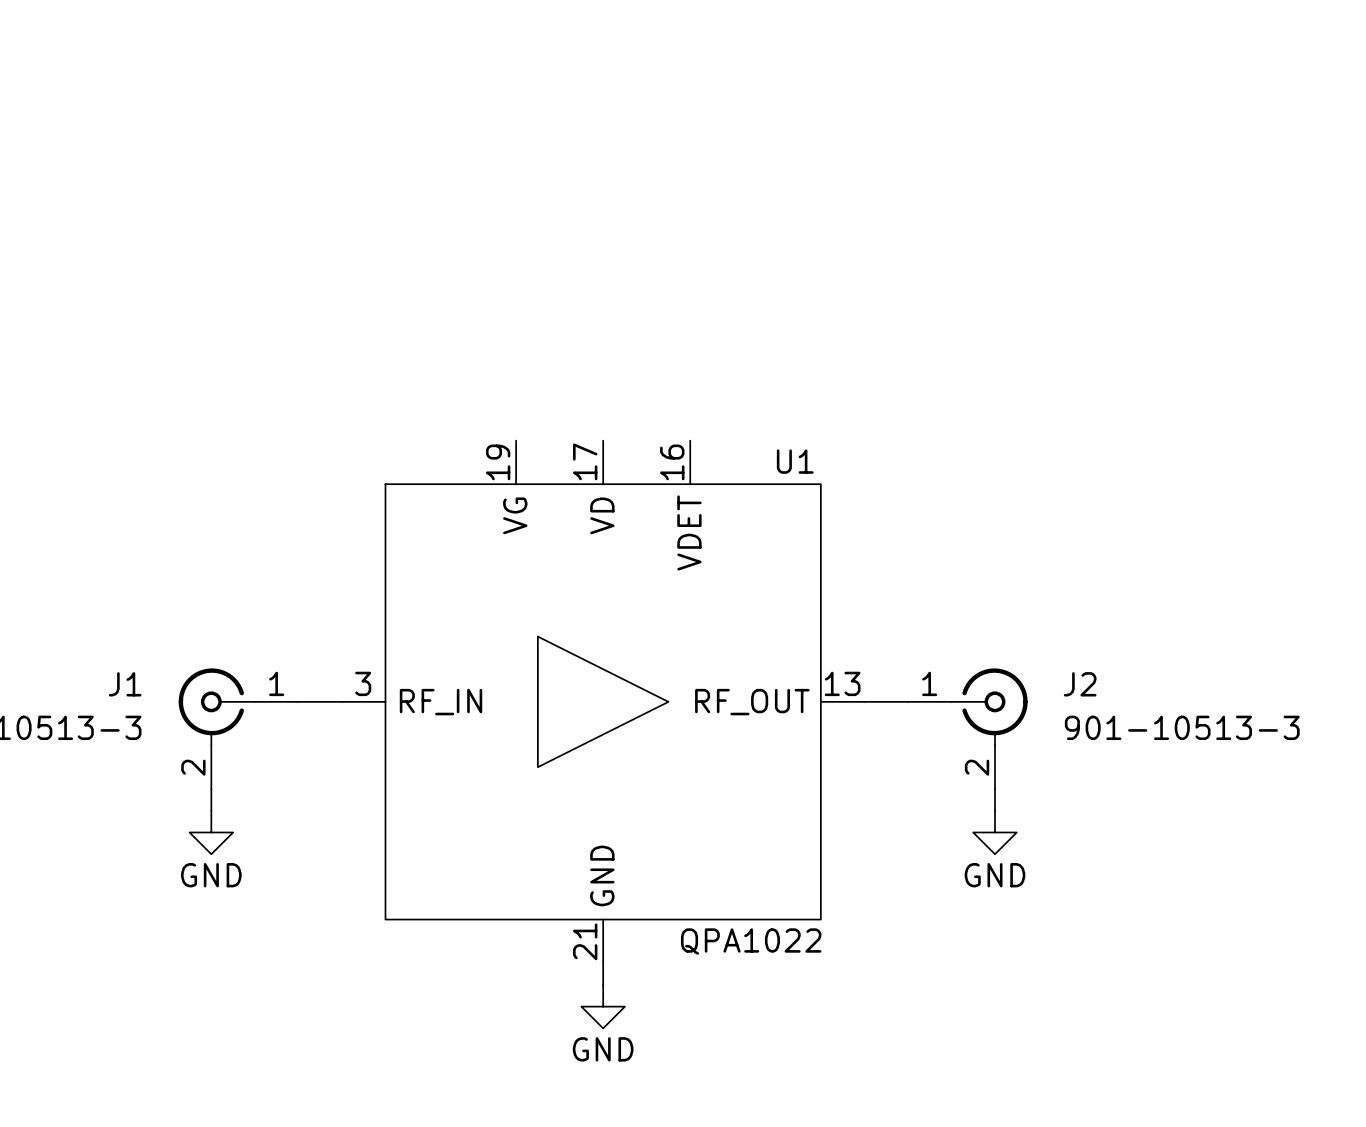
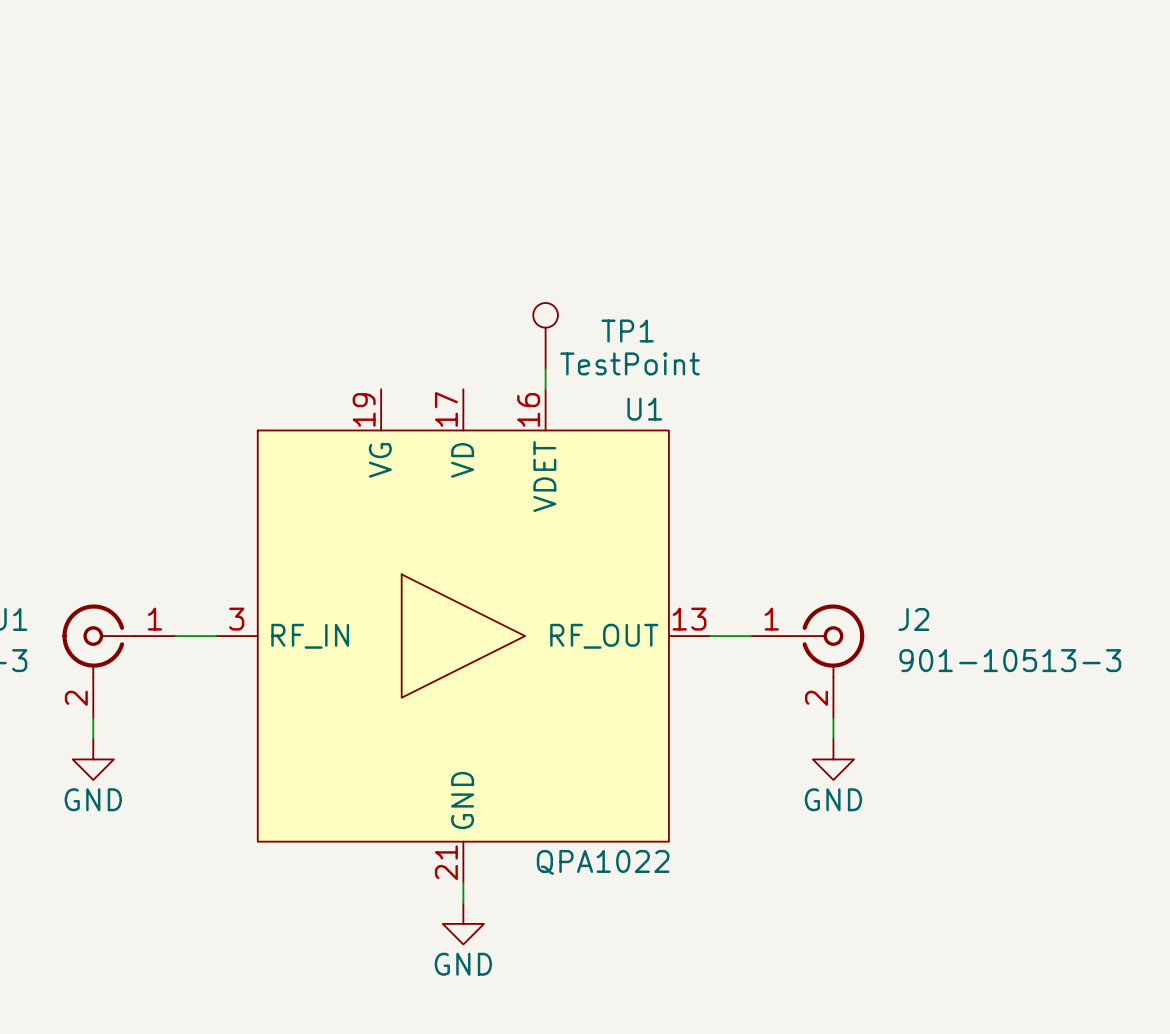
TP1: none -> TestPoint (545, 335)
wire: none -> (545, 368) (545, 389)

